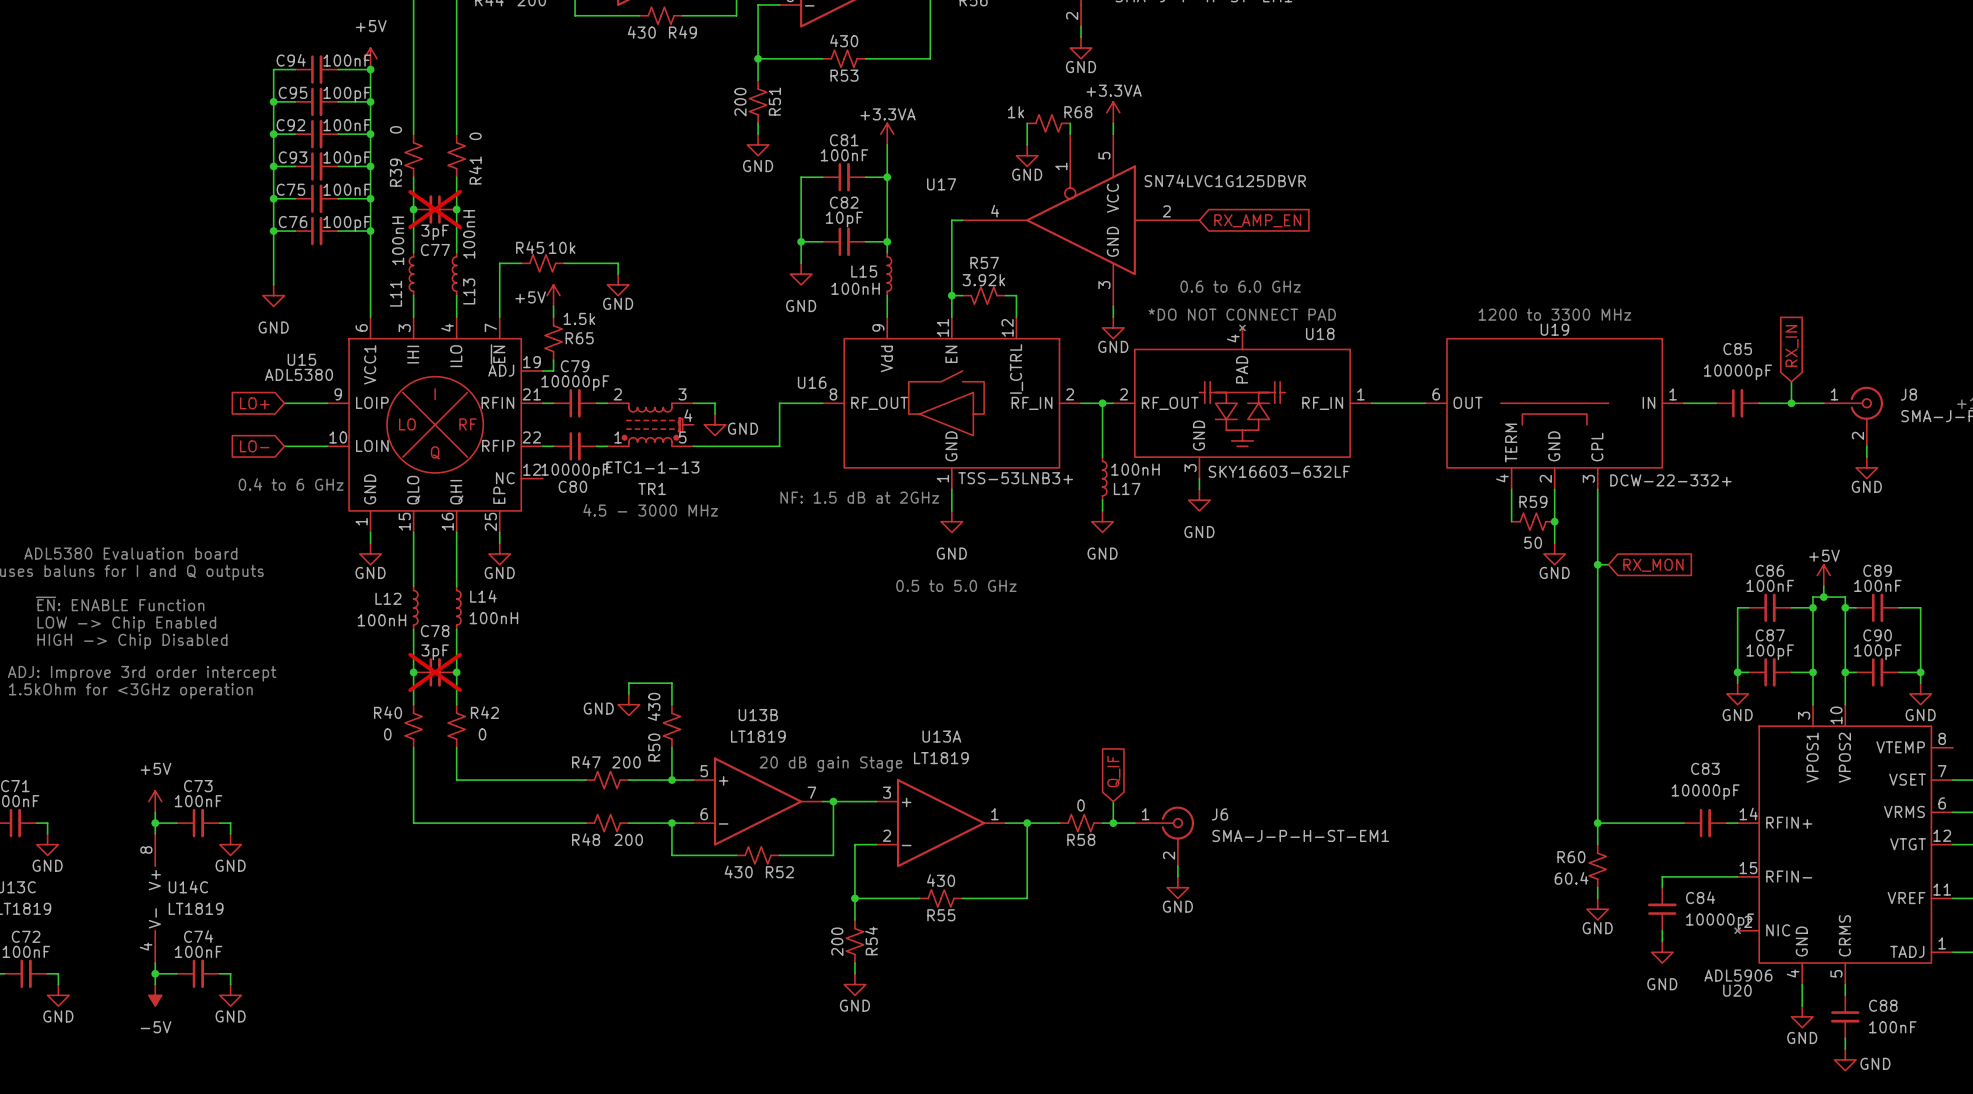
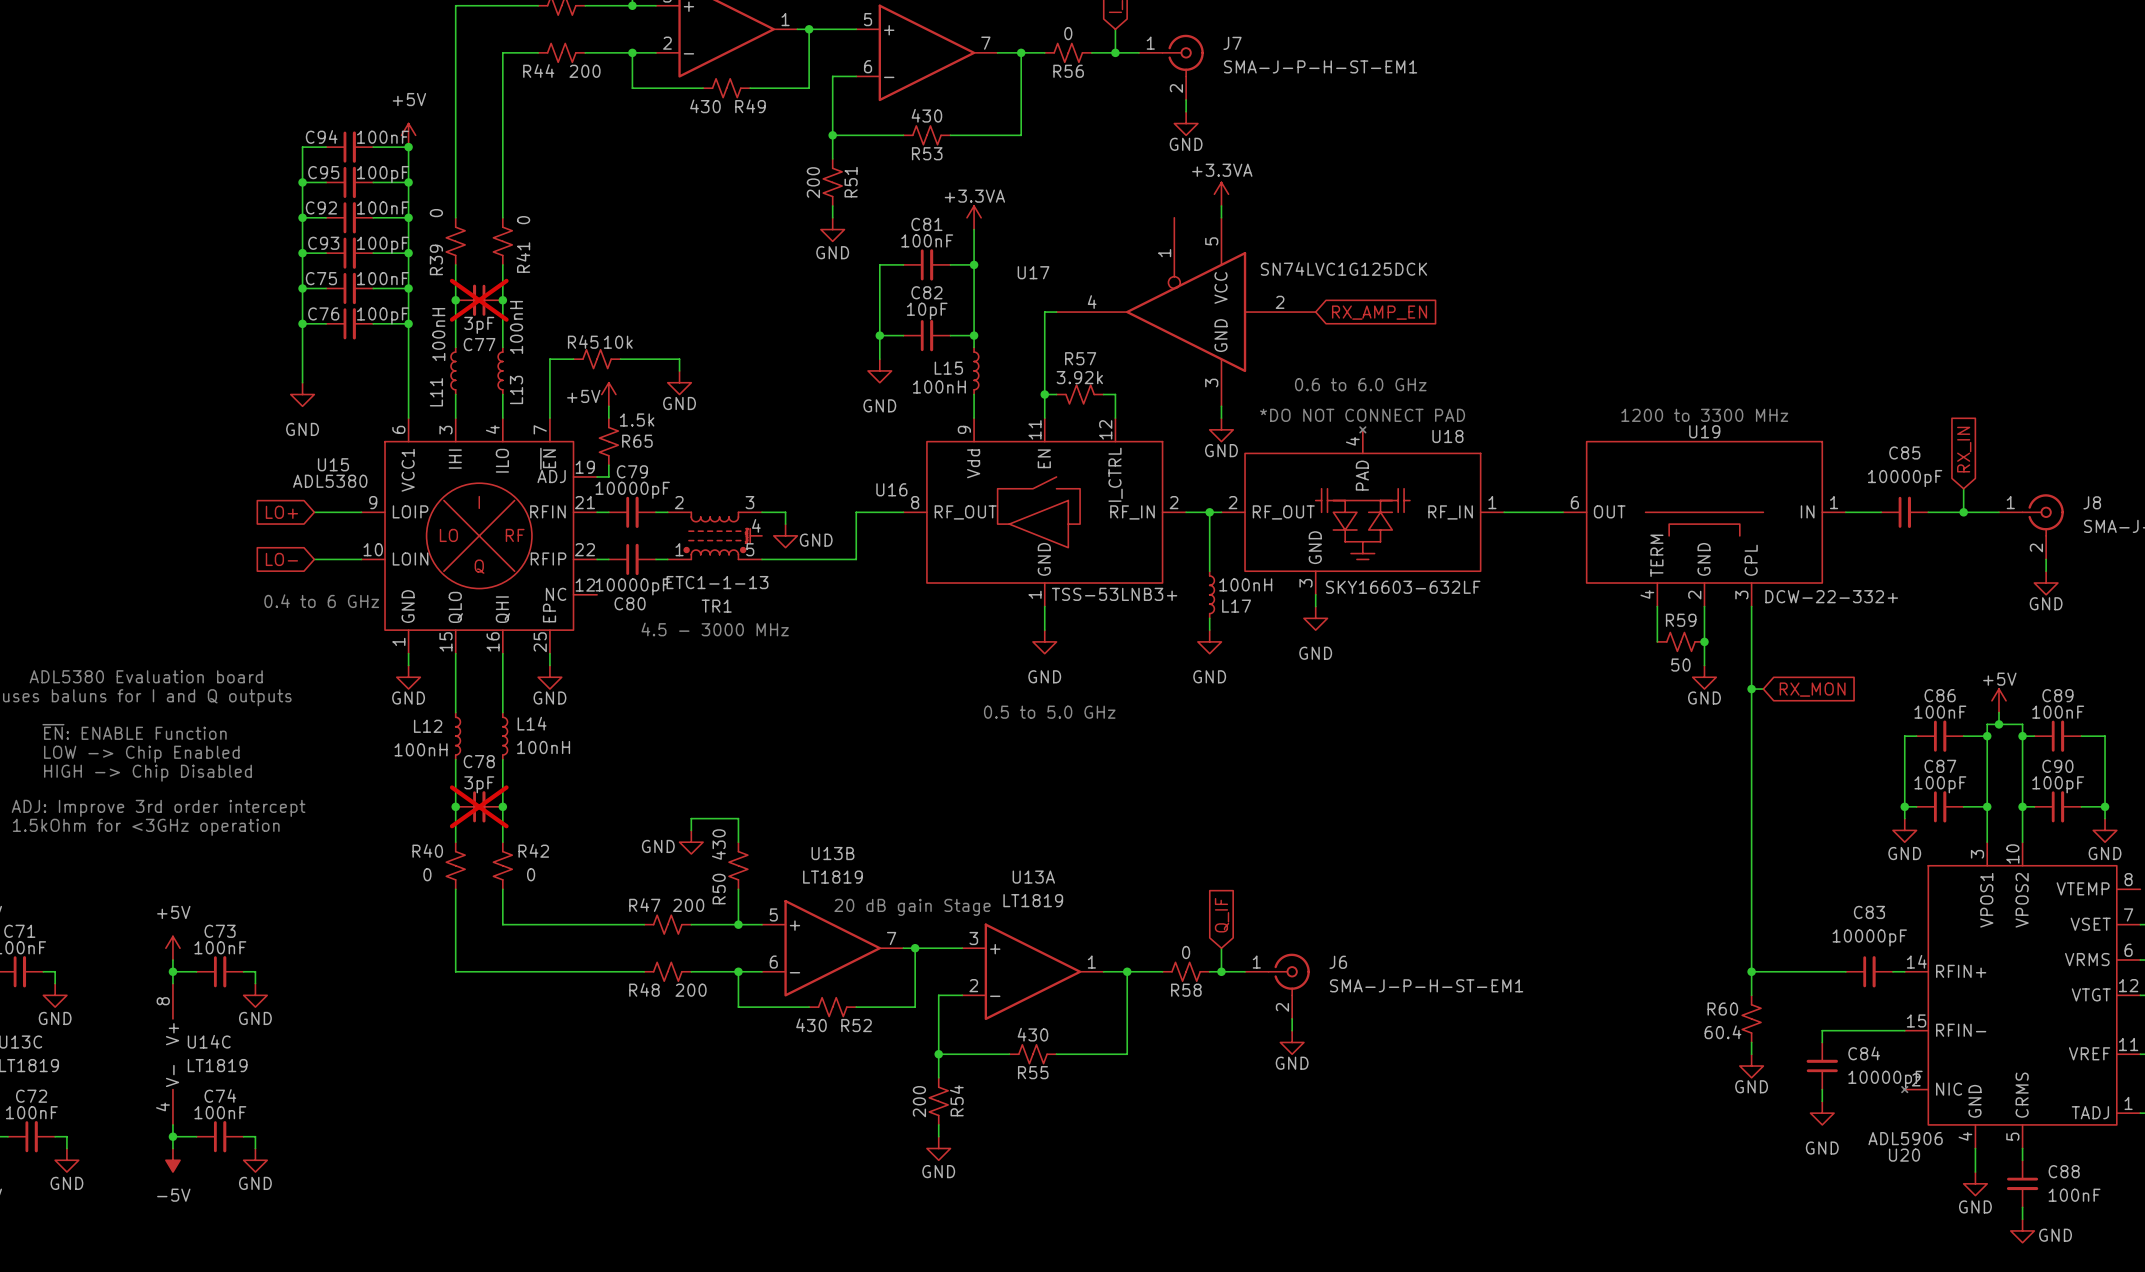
wire: (1027, 123) (1027, 144) -> none
R68: 1k (1048, 123) -> none
wire: (1070, 123) (1070, 134) -> none
power symbol: GND (1027, 155) -> none
U17 value: SN74LVC1G125DBVR (1225, 180) -> SN74LVC1G125DCK (1343, 268)
text: NF: 1.5 dB at 2GHz (859, 497) -> none

